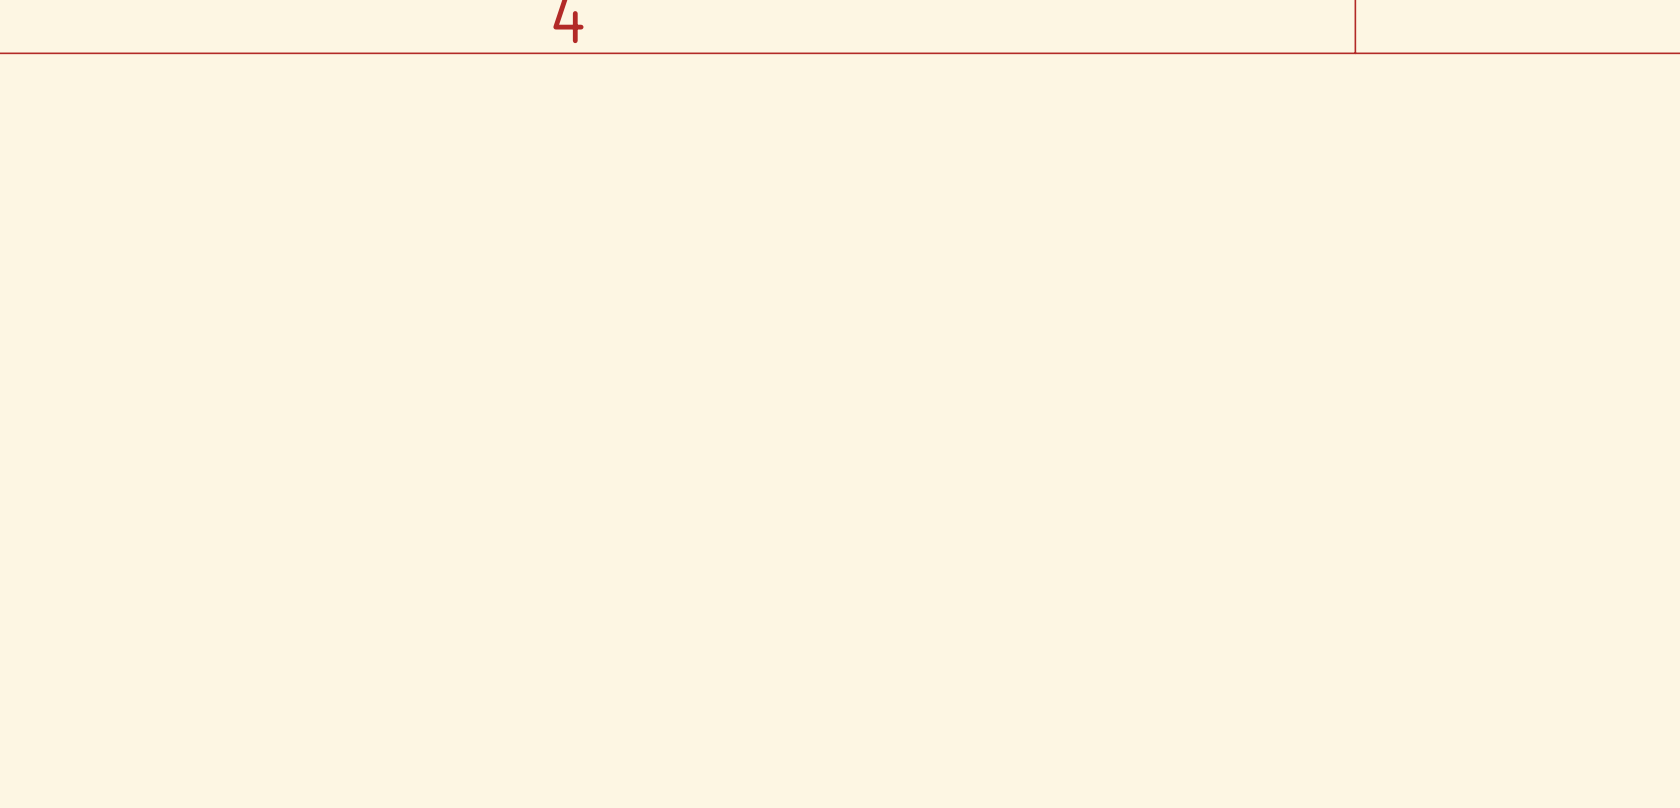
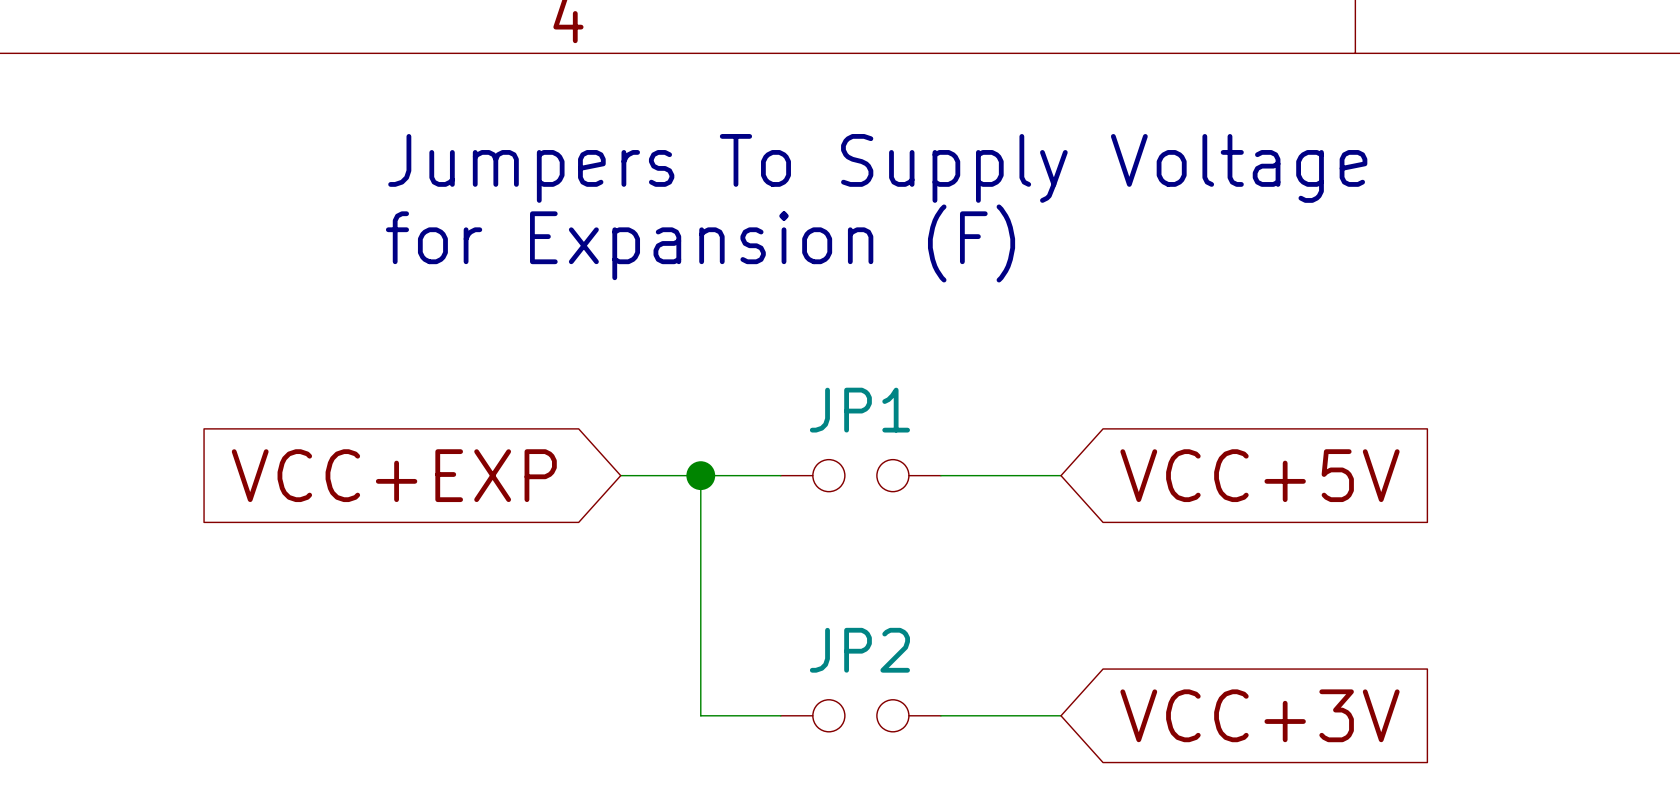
text: none -> Jumpers To Supply Voltage (877, 168)
text: none -> for Expansion (F) (700, 243)
global label: none -> VCC+EXP (394, 475)
wire: none -> (620, 475) (780, 475)
wire: none -> (700, 475) (700, 715) (780, 715)
junction: none -> (700, 475)
JP1: none -> (860, 475)
wire: none -> (940, 475) (1061, 475)
global label: none -> VCC+5V (1260, 475)
JP2: none -> (860, 715)
wire: none -> (940, 715) (1061, 715)
global label: none -> VCC+3V (1260, 715)

